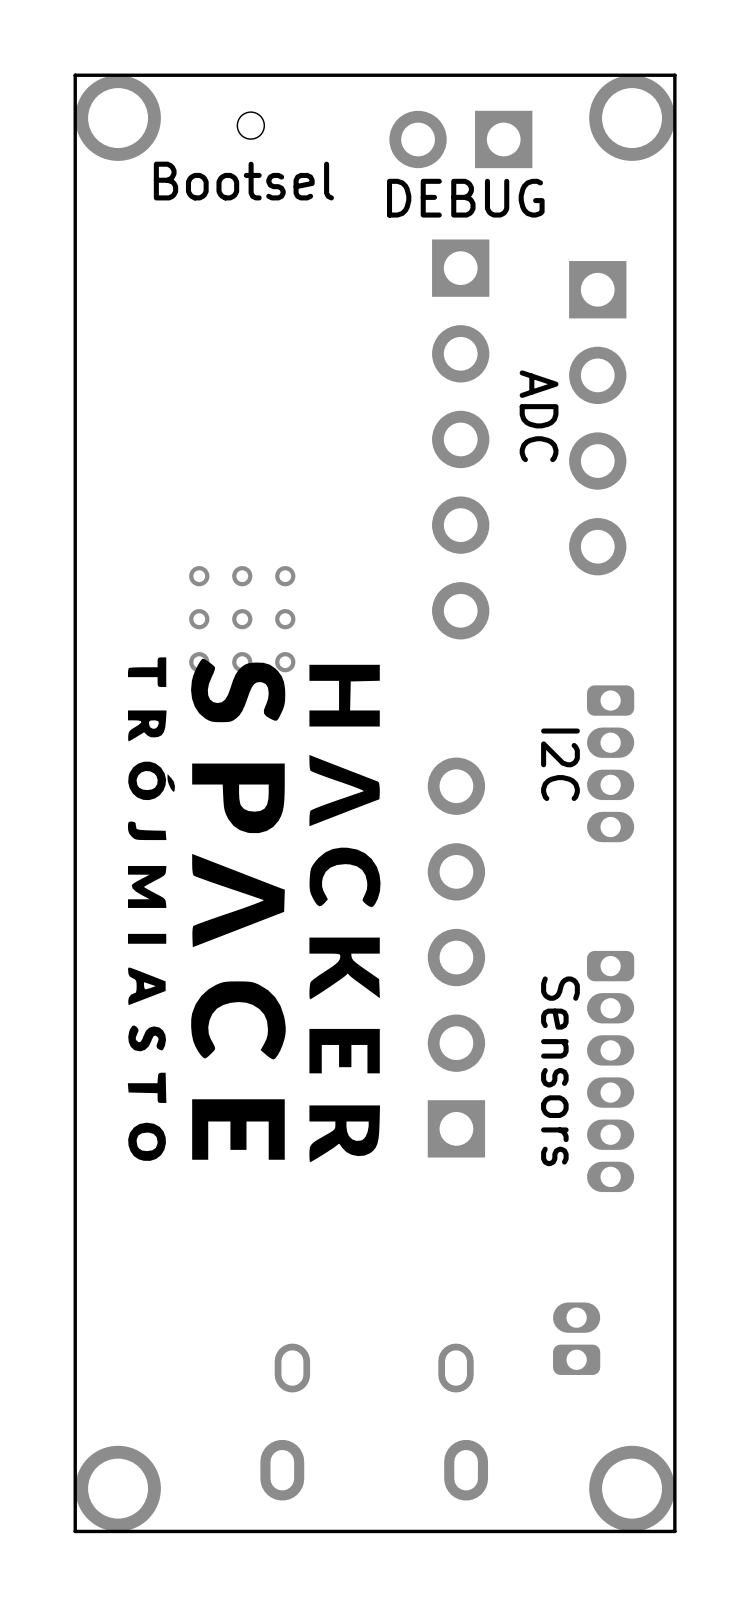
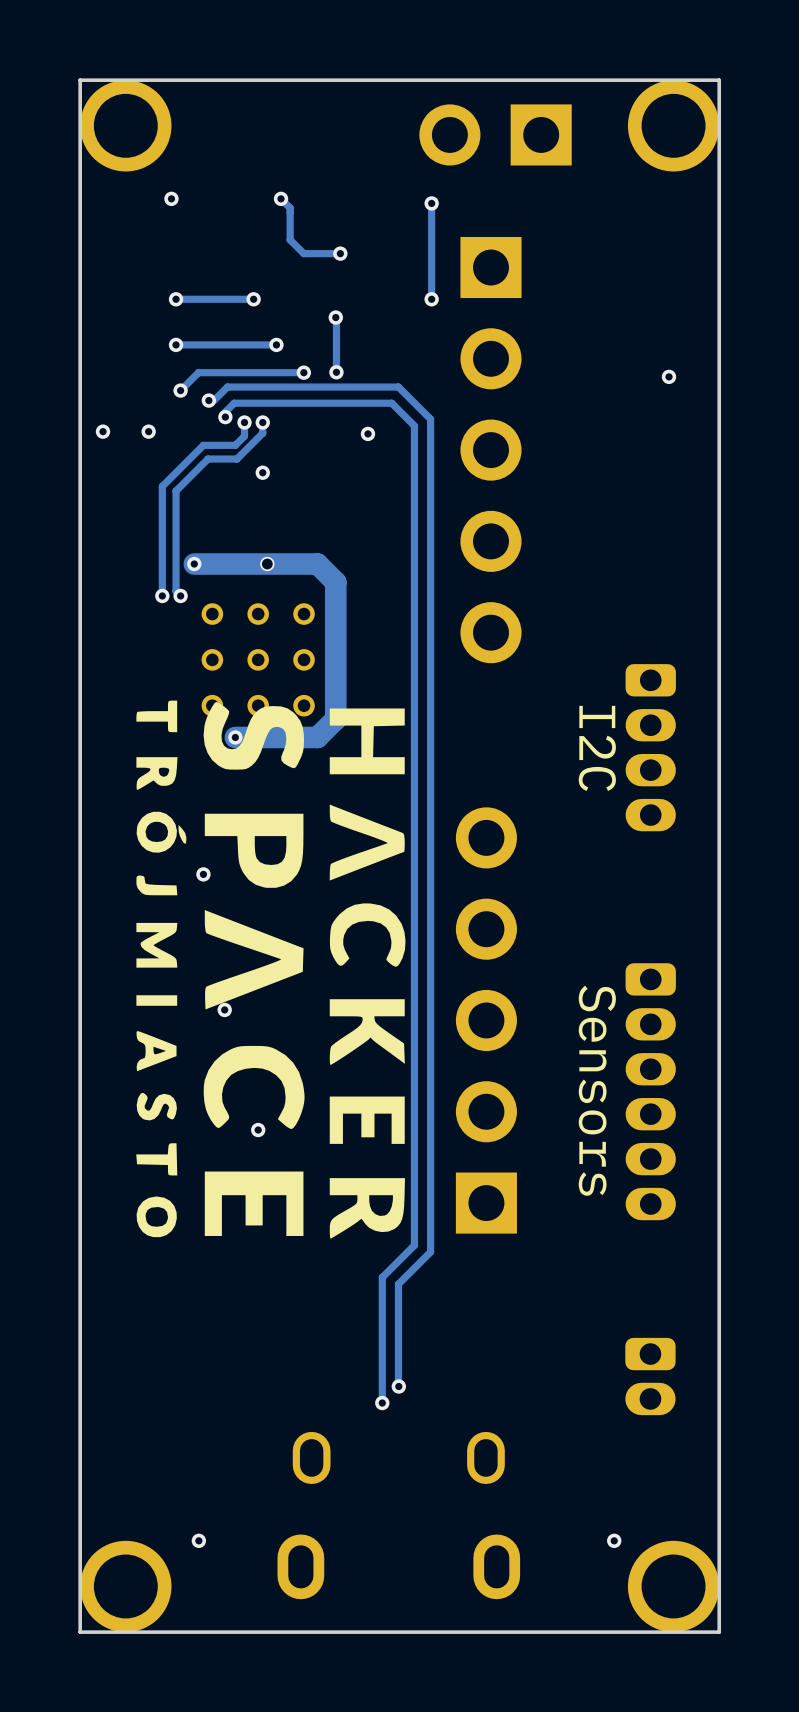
part: Bootsel (250, 125) -> none
part position: (460, 139) -> (495, 134)
via: none -> (171, 198)
track: none -> (281, 198) (290, 207) (290, 239) (303, 253) (340, 253)
via: none -> (281, 198)
track: none -> (431, 203) (431, 299)
via: none -> (431, 203)
part value: DEBUG (465, 198) -> none
via: none -> (340, 253)
via: none -> (176, 299)
track: none -> (253, 299) (176, 299)
via: none -> (253, 299)
via: none -> (431, 299)
track: none -> (335, 317) (336, 372)
via: none -> (335, 317)
via: none -> (176, 344)
track: none -> (276, 344) (176, 344)
via: none -> (276, 344)
track: none -> (303, 372) (198, 372) (180, 390)
via: none -> (303, 372)
via: none -> (336, 372)
via: none -> (669, 376)
via: none -> (180, 390)
track: none -> (208, 400) (213, 400) (227, 387) (398, 387) (430, 419) (430, 1252) (398, 1284) (398, 1386)
via: none -> (208, 400)
track: none -> (225, 417) (225, 412) (234, 403) (391, 403) (414, 425) (414, 1245) (382, 1277) (382, 1403)
via: none -> (225, 417)
track: none -> (244, 422) (244, 436) (235, 445) (203, 445) (162, 486) (162, 595)
via: none -> (244, 422)
track: none -> (262, 422) (262, 433) (236, 459) (207, 459) (176, 490) (176, 591) (180, 595)
via: none -> (262, 422)
via: none -> (103, 431)
via: none -> (148, 431)
via: none -> (367, 433)
part: ADC (597, 418) -> none
part position: (460, 439) -> (490, 450)
via: none -> (262, 472)
track: none -> (194, 564) (317, 564) (335, 582) (335, 719) (317, 737) (235, 737)
via: none -> (194, 564)
via: none -> (267, 564)
via: none -> (162, 595)
via: none -> (180, 595)
via: none -> (235, 737)
part position: (610, 763) -> (650, 747)
via: none -> (203, 874)
via: none -> (224, 1009)
via: none -> (258, 1130)
part position: (610, 1071) -> (650, 1091)
via: none -> (398, 1386)
via: none -> (382, 1403)
part rotation: 0° (576, 1338) -> 180° (650, 1376)
part position: (576, 1338) -> (650, 1376)
via: none -> (198, 1540)
via: none -> (614, 1540)

